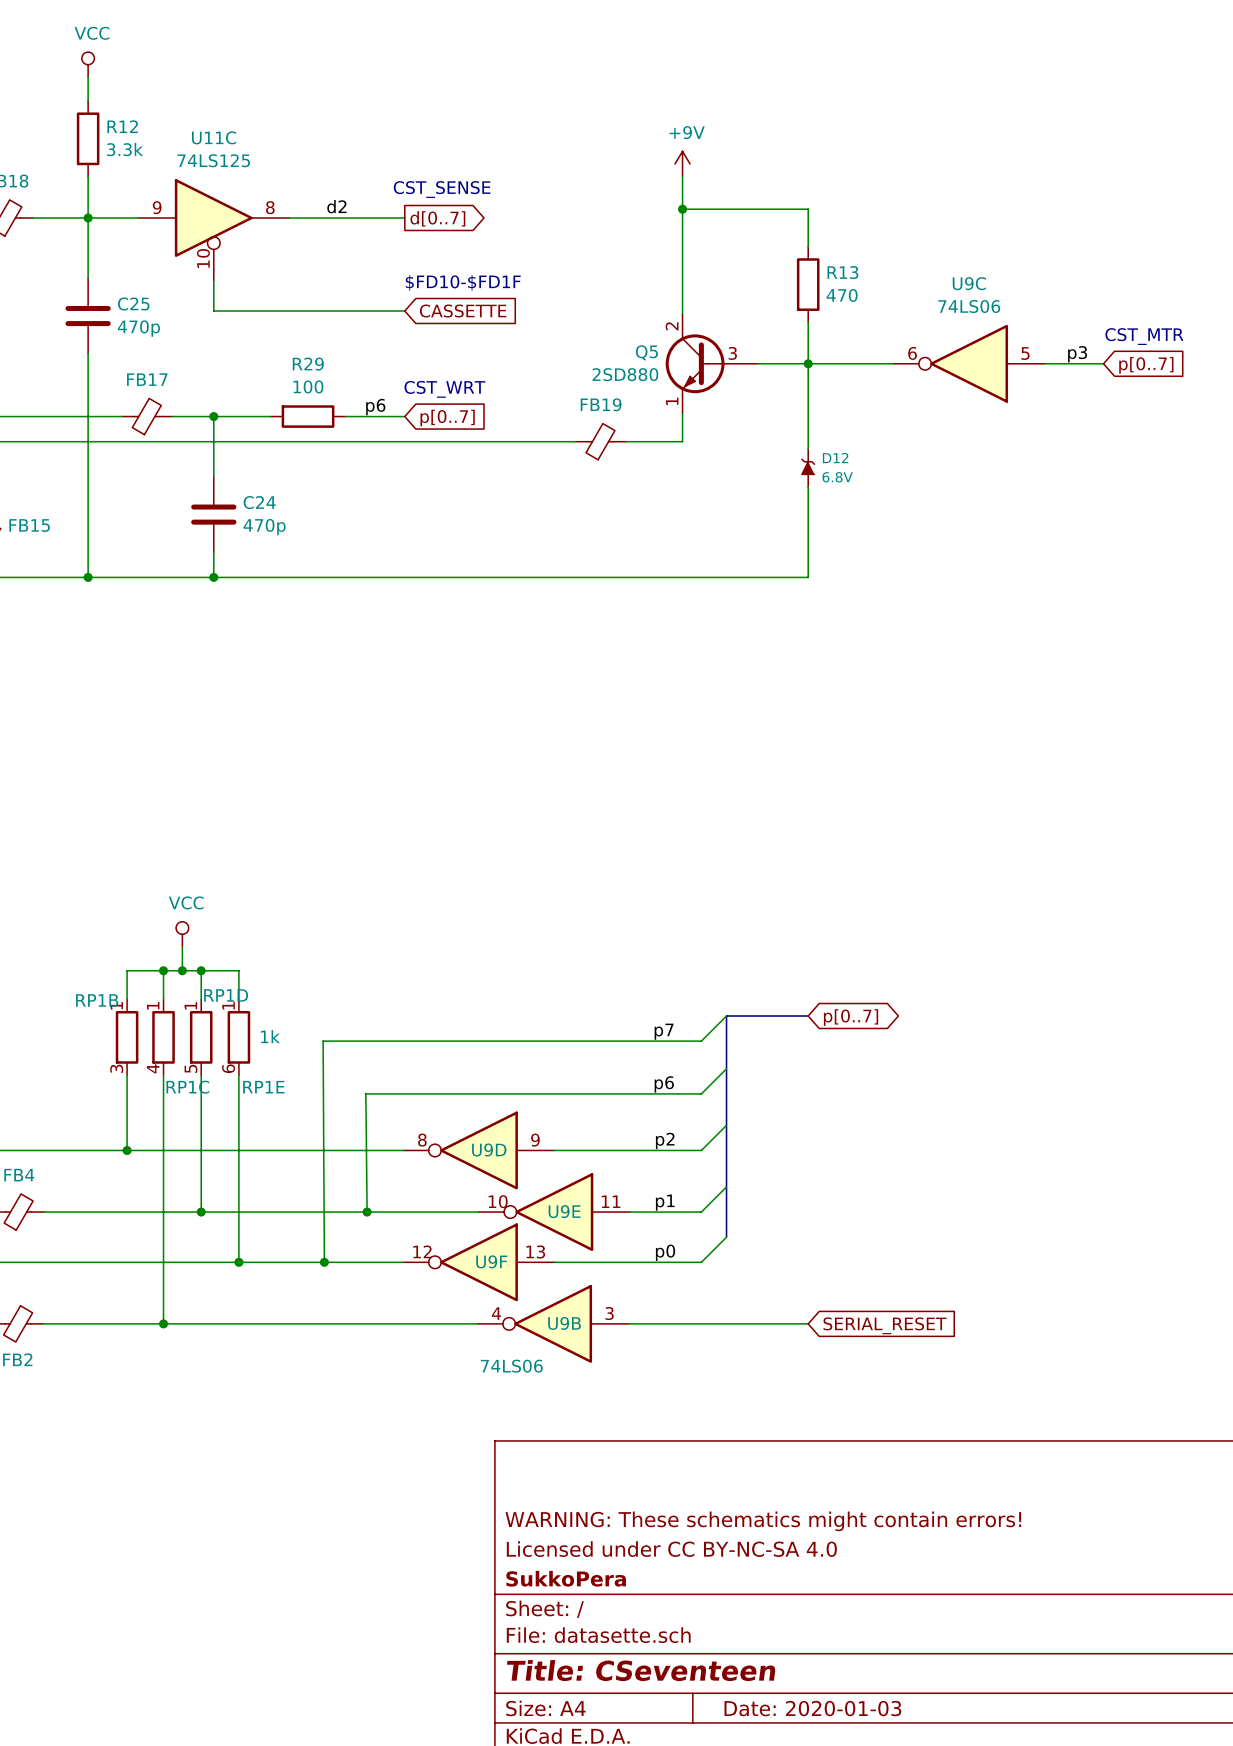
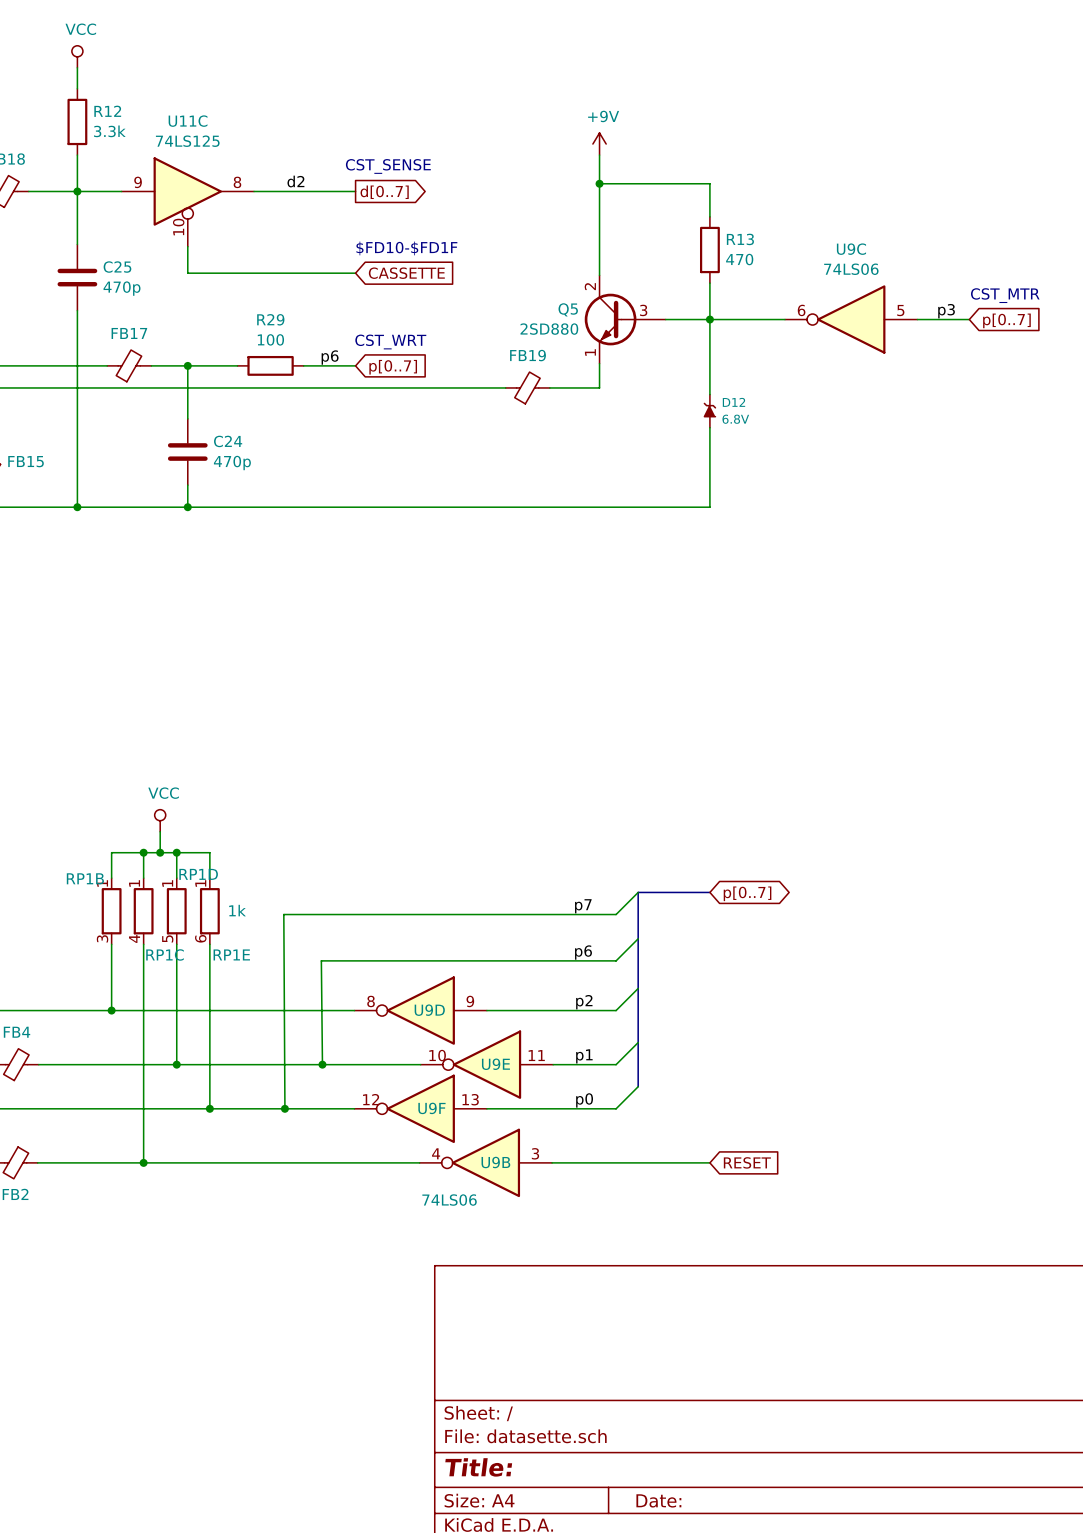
global label: SERIAL_RESET (885, 1325) -> RESET (747, 1162)
title block: WARNING: These schematics might contain errors! (763, 1521) -> none
title block: Licensed under CC BY-NC-SA 4.0 (671, 1549) -> none
title block: SukkoPera (566, 1578) -> none
title block: Title: CSeventeen (641, 1670) -> Title: (478, 1467)
title block: Date: 2020-01-03 (812, 1708) -> Date: (658, 1500)

